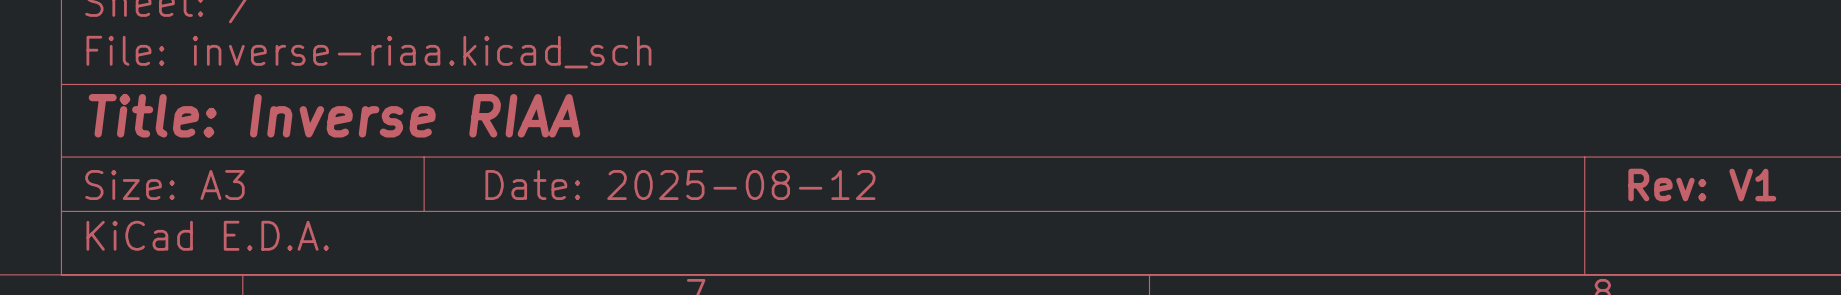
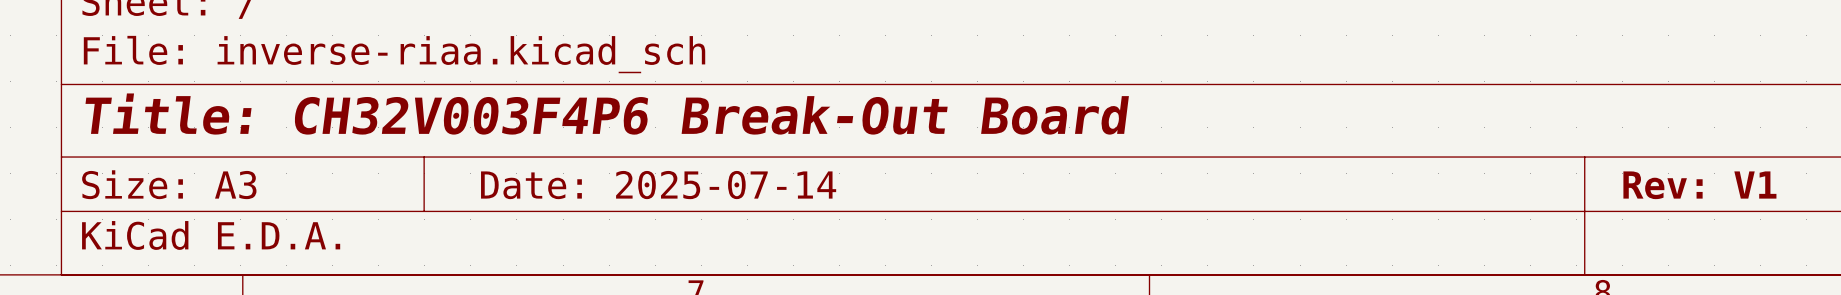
title block: Title: Inverse RIAA (334, 115) -> Title: CH32V003F4P6 Break-Out Board (607, 114)
title block: Date: 2025-08-12 (680, 185) -> Date: 2025-07-14 (658, 185)

